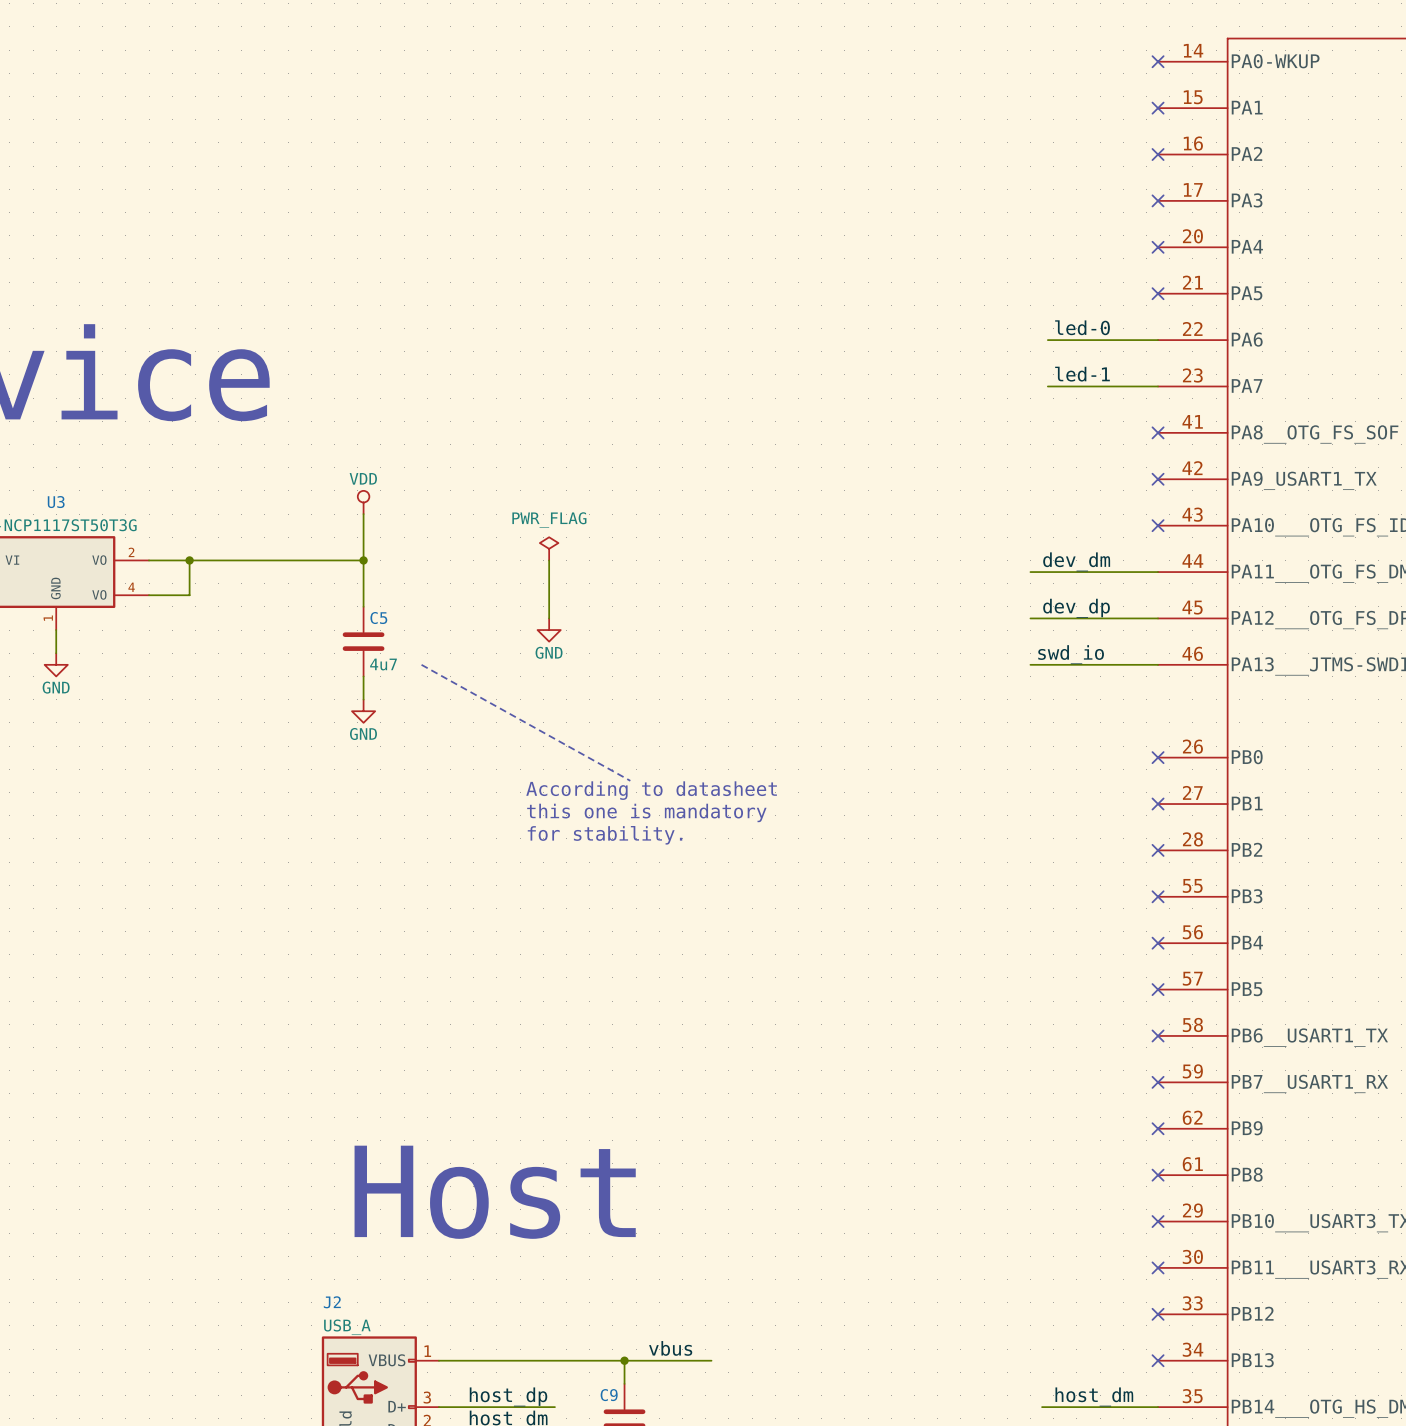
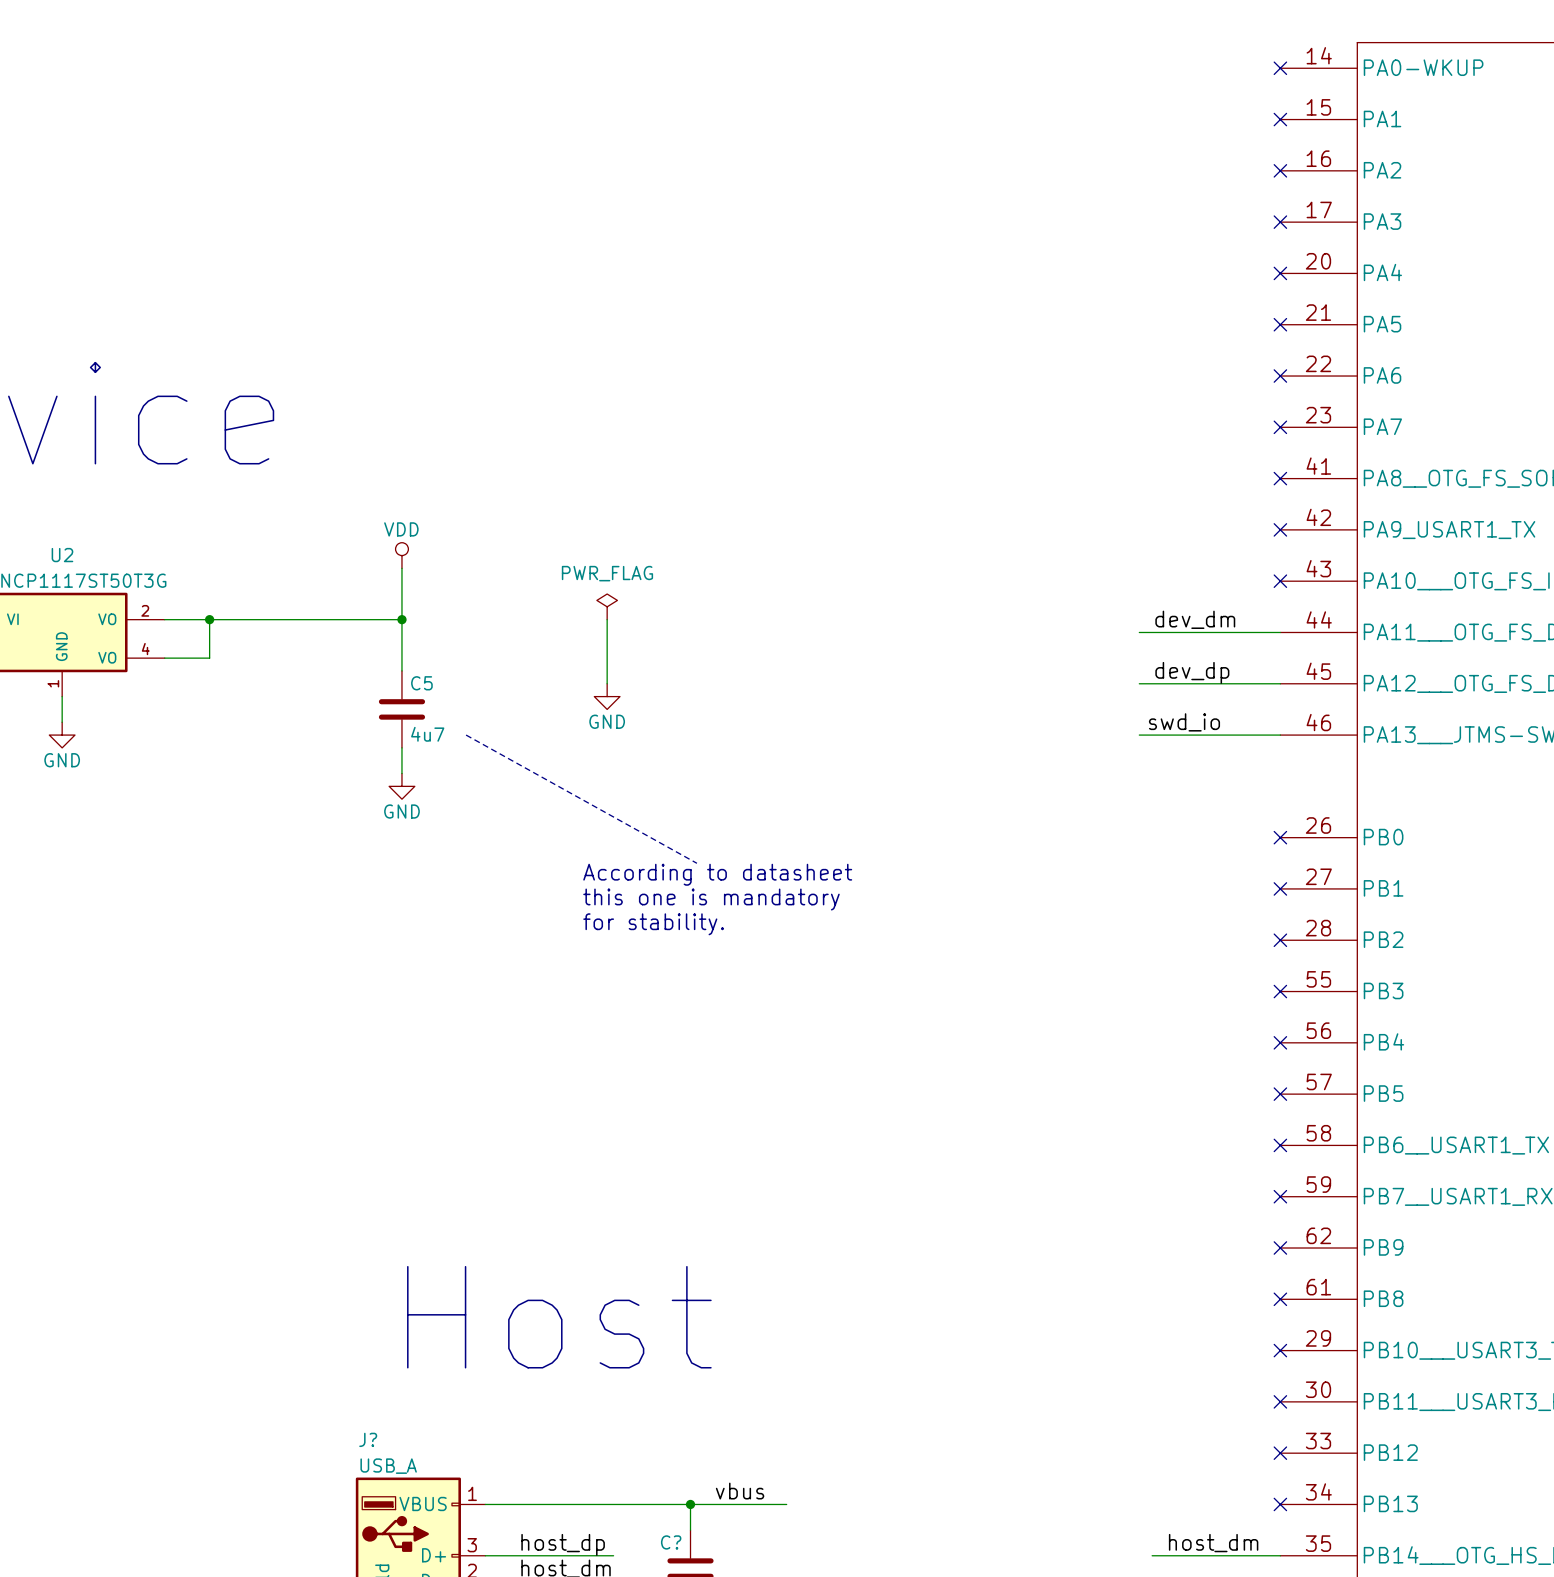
label: led-0 (1082, 327) -> none
wire: (1047, 340) (1158, 340) -> none
no-connect mark: none -> (1280, 376)
label: led-1 (1082, 374) -> none
wire: (1047, 386) (1158, 386) -> none
no-connect mark: none -> (1280, 427)
U3 name: U3 (56, 502) -> U2 (62, 555)
J2 name: J2 (332, 1302) -> J? (368, 1439)
C9 name: C9 (609, 1395) -> C? (671, 1542)

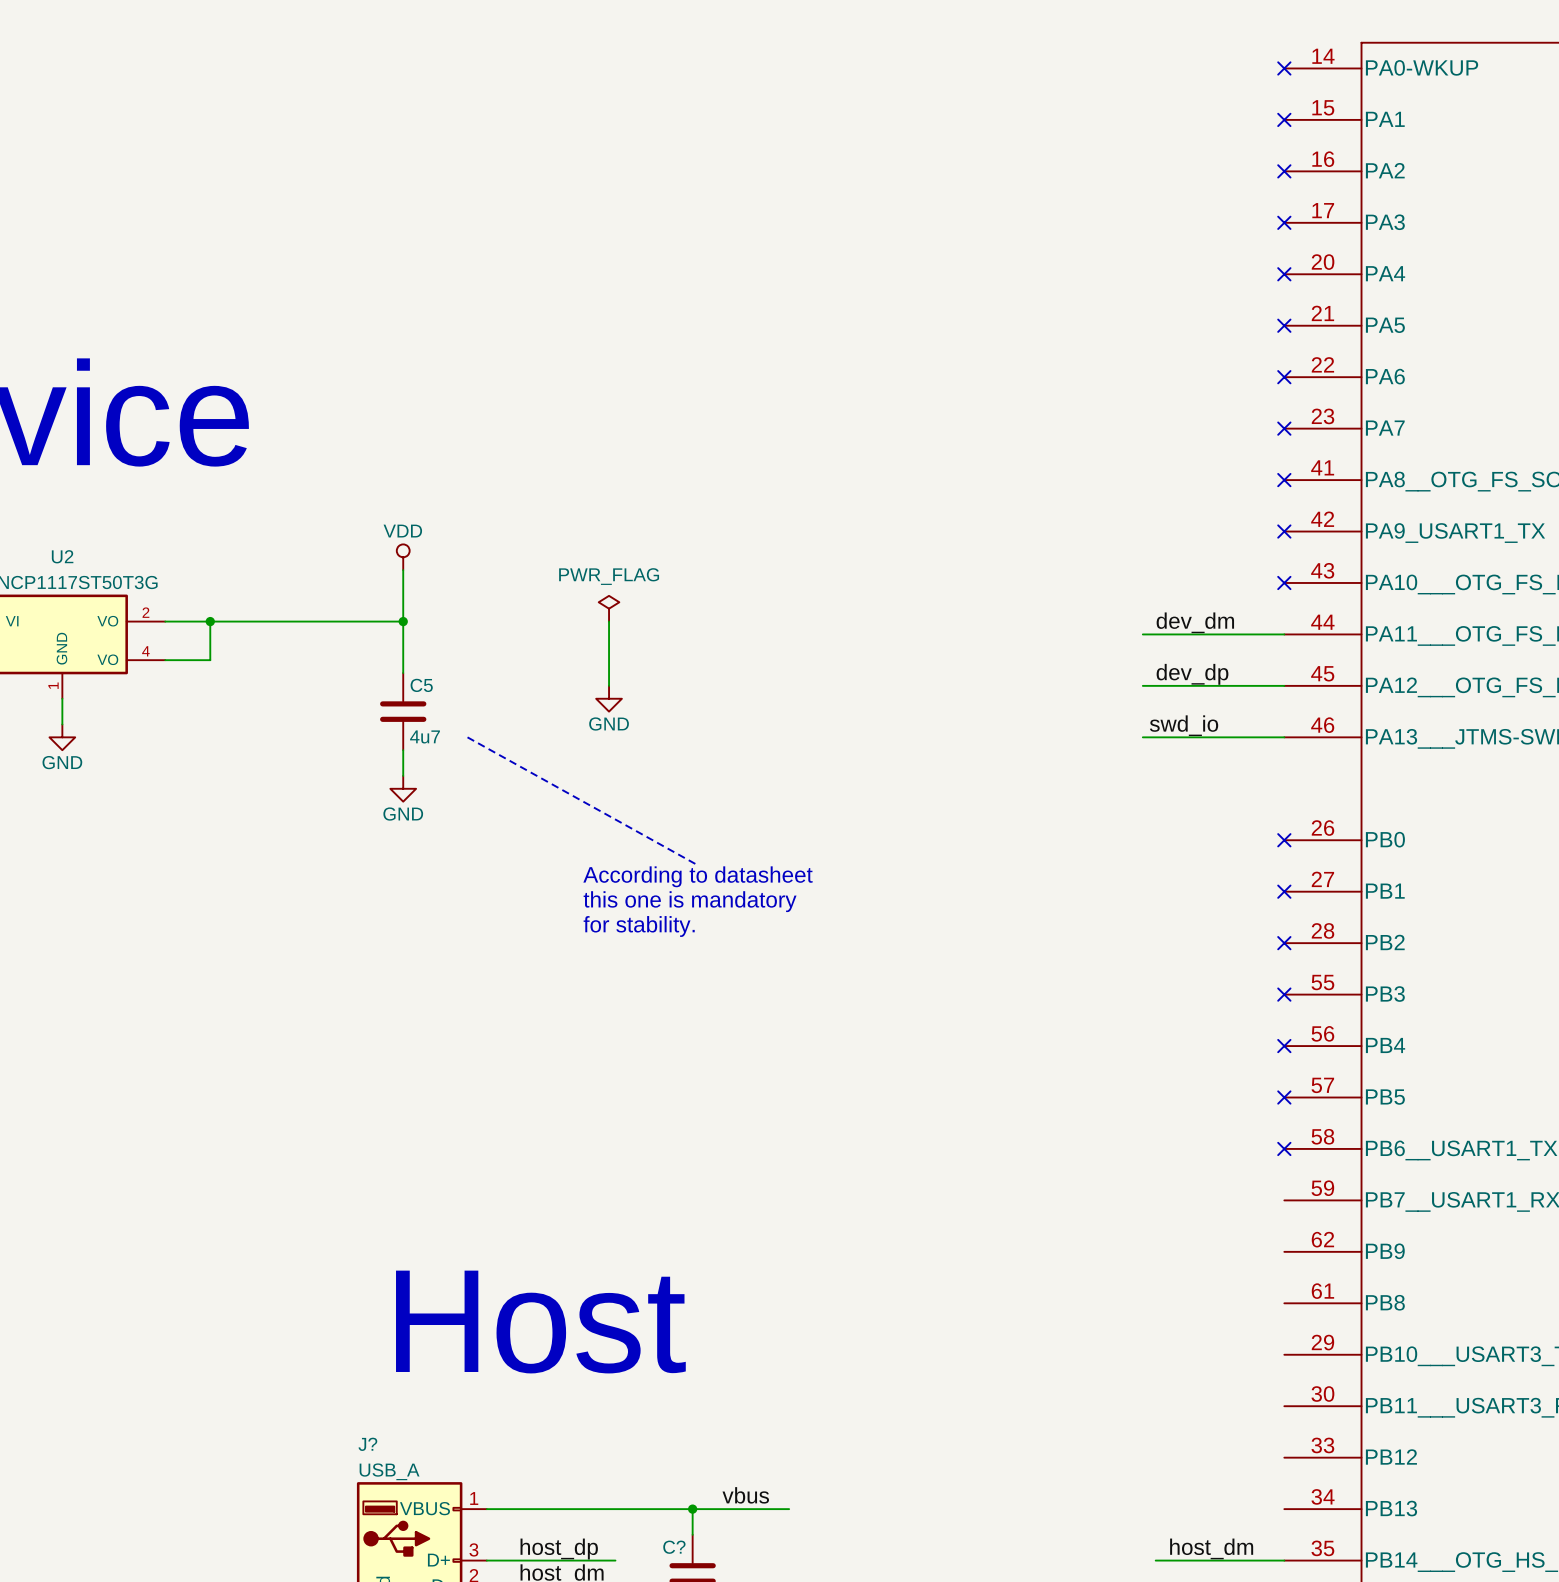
no-connect mark: (1280, 1196) -> none
no-connect mark: (1280, 1248) -> none
no-connect mark: (1280, 1299) -> none
no-connect mark: (1280, 1350) -> none
no-connect mark: (1280, 1401) -> none
no-connect mark: (1280, 1453) -> none
no-connect mark: (1280, 1504) -> none

